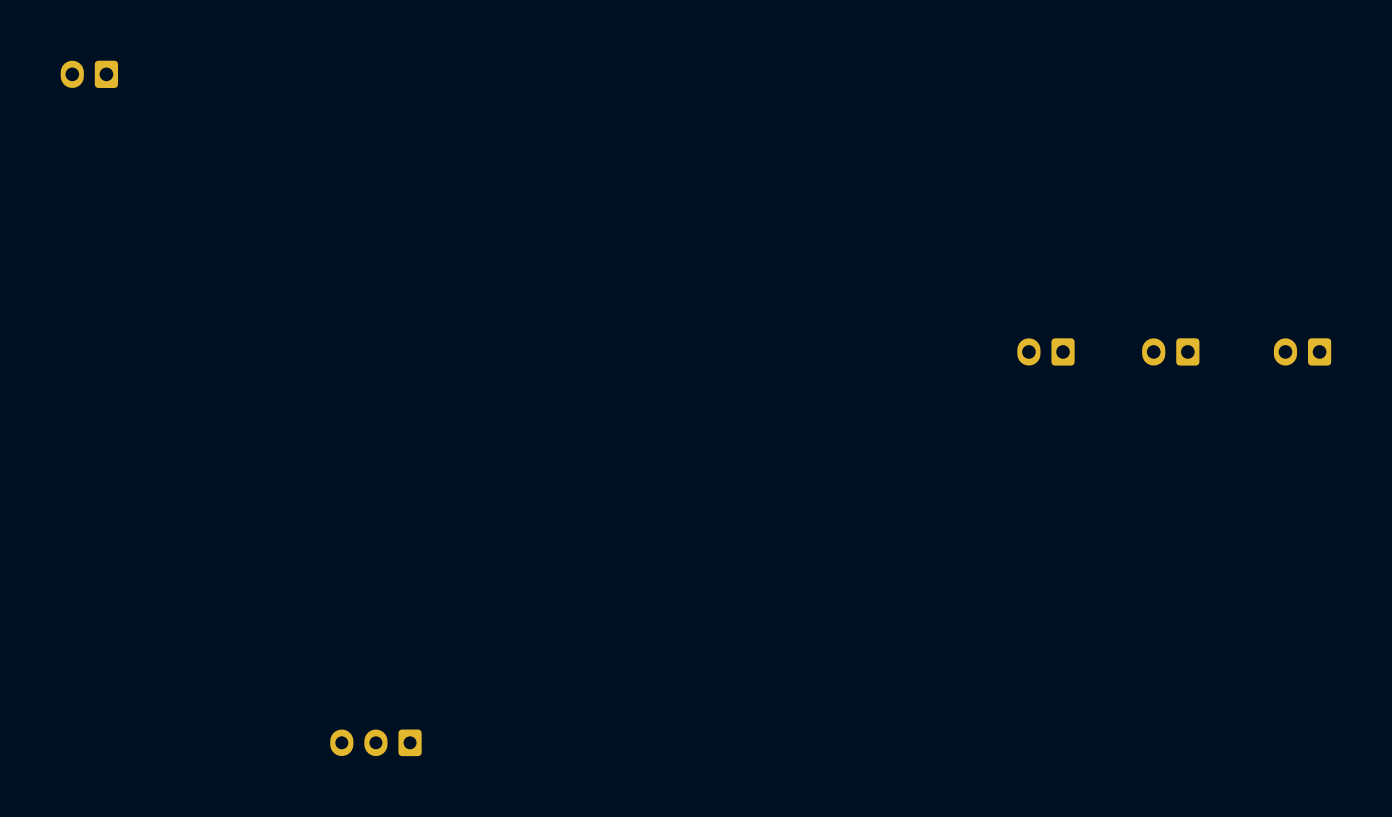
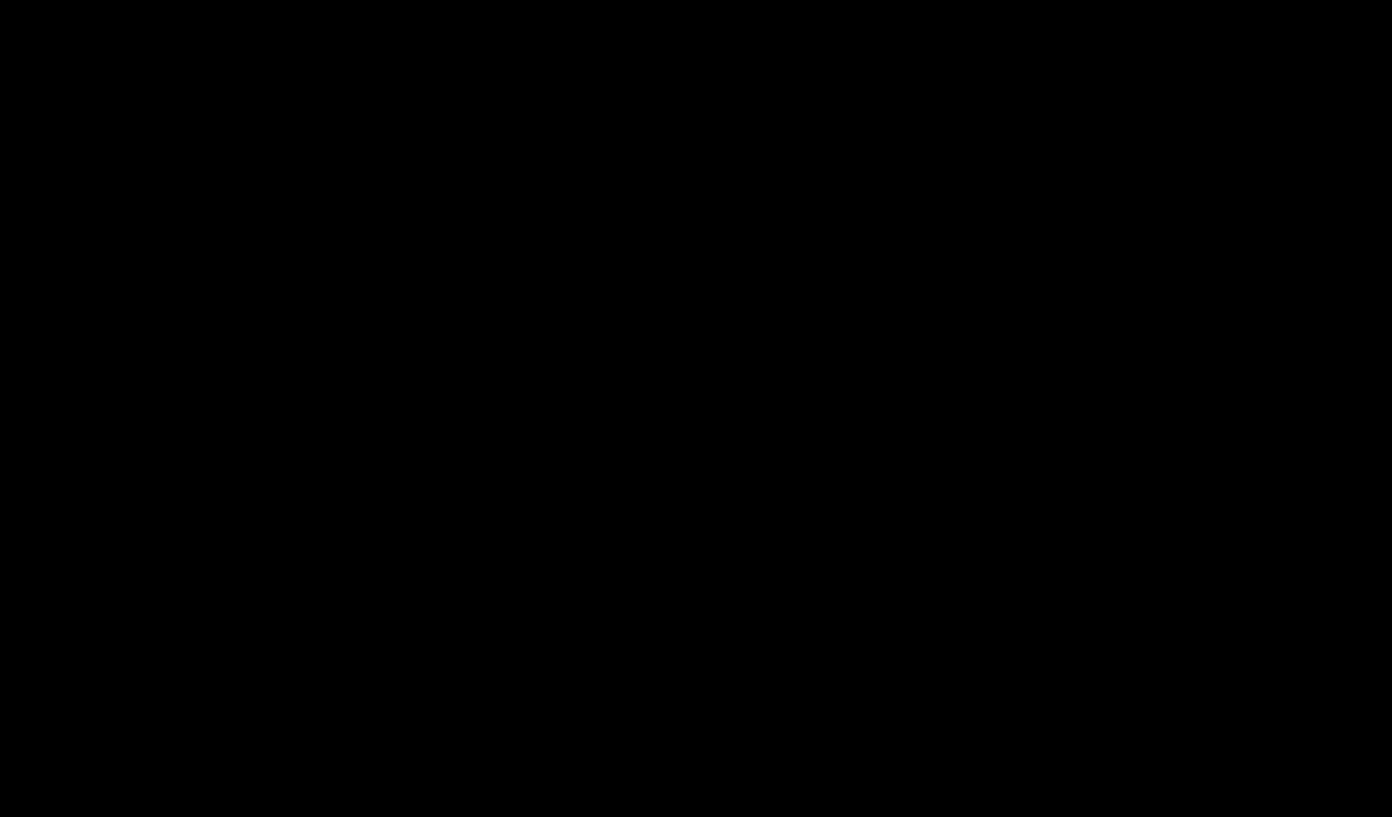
part: (89, 74) -> none
part: (1045, 351) -> none
part: (1170, 351) -> none
part: (1302, 351) -> none
part: (375, 742) -> none

